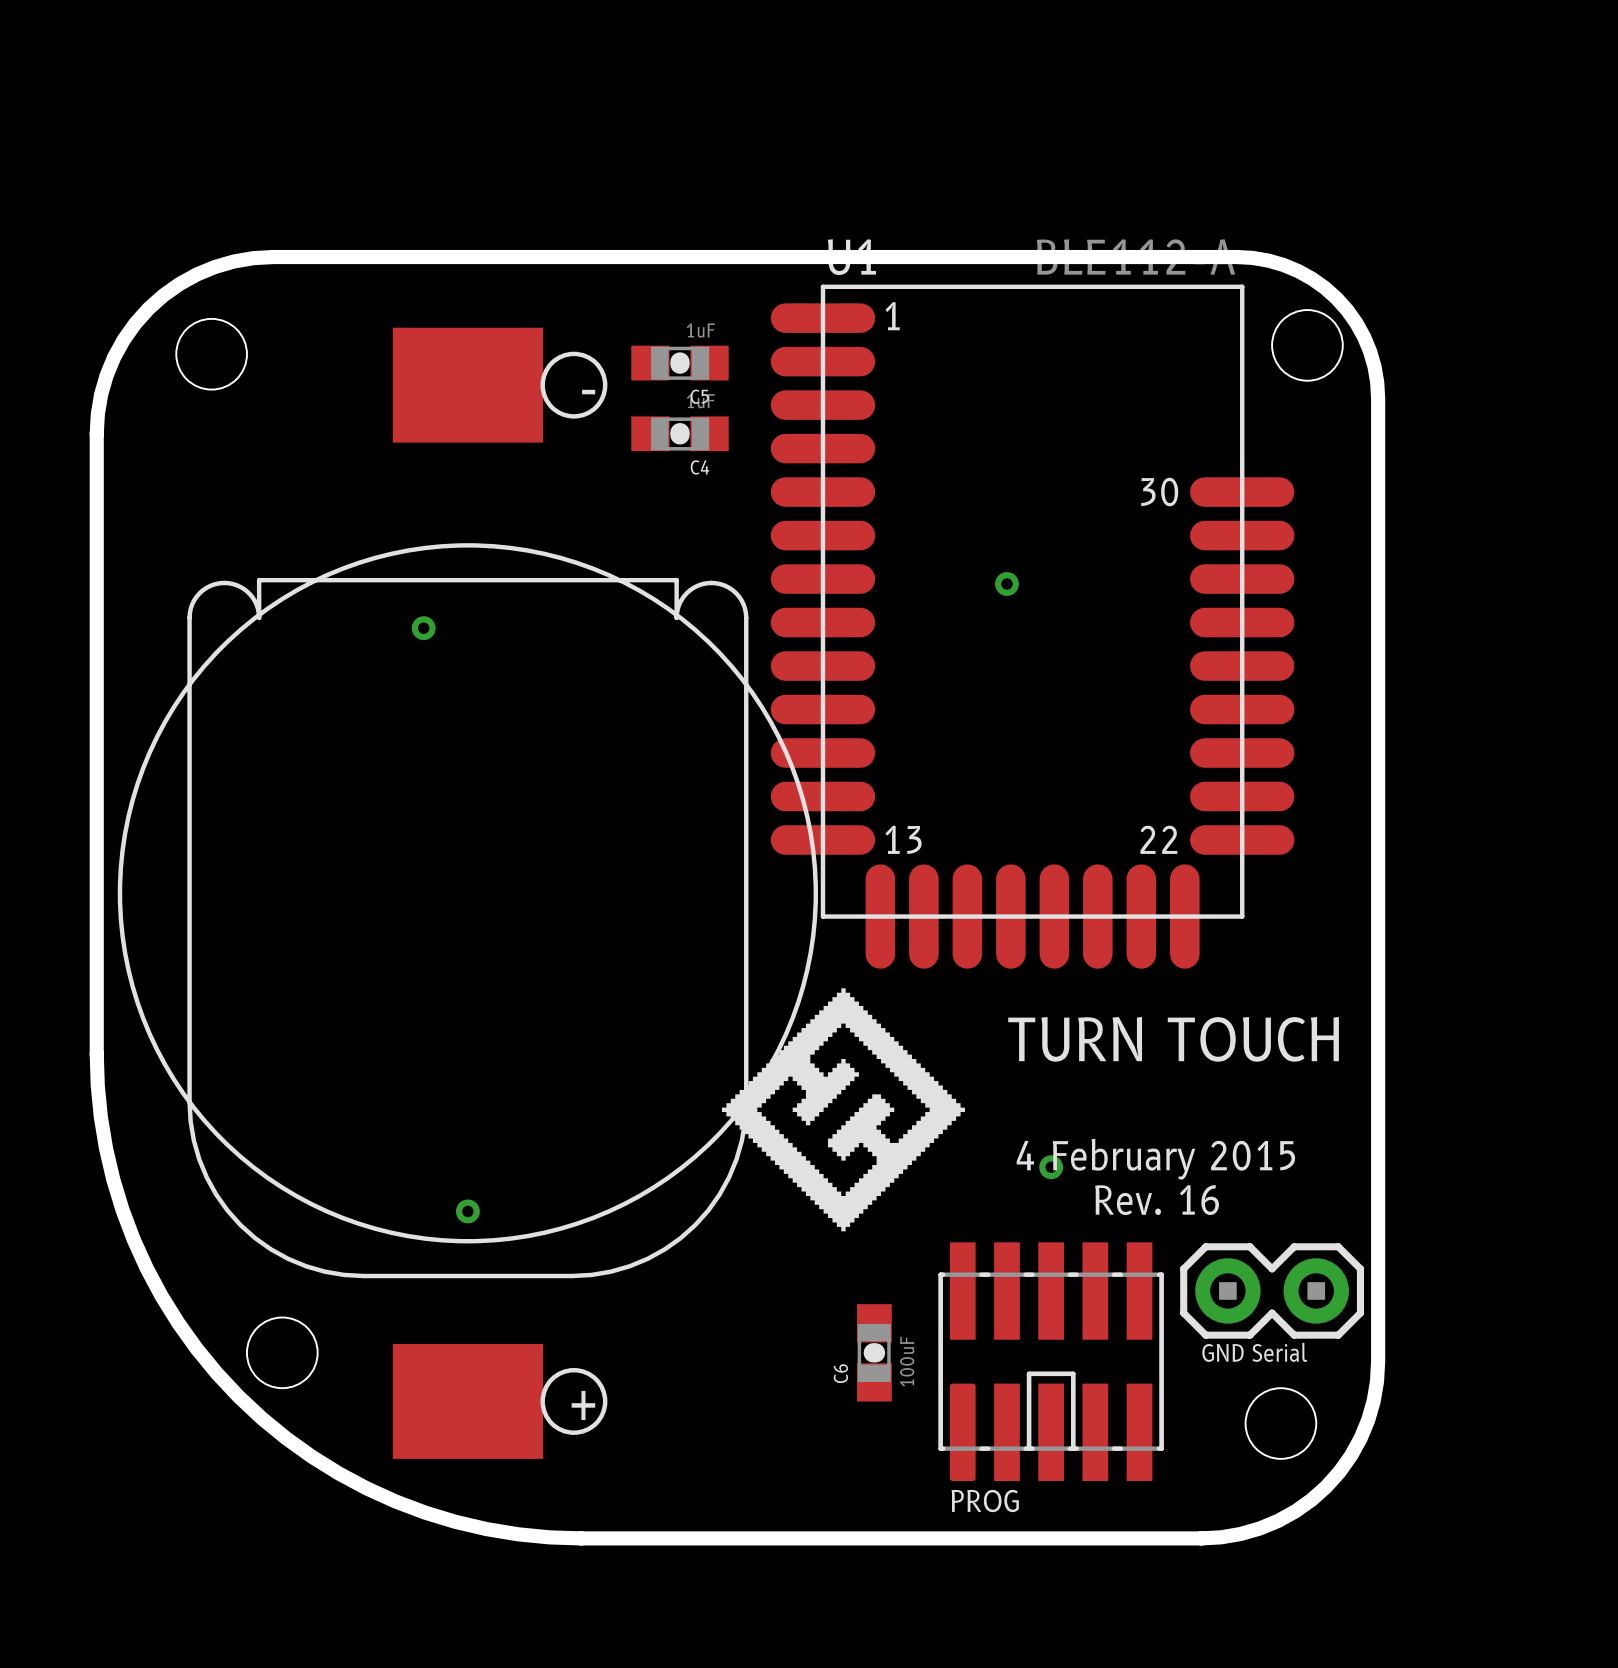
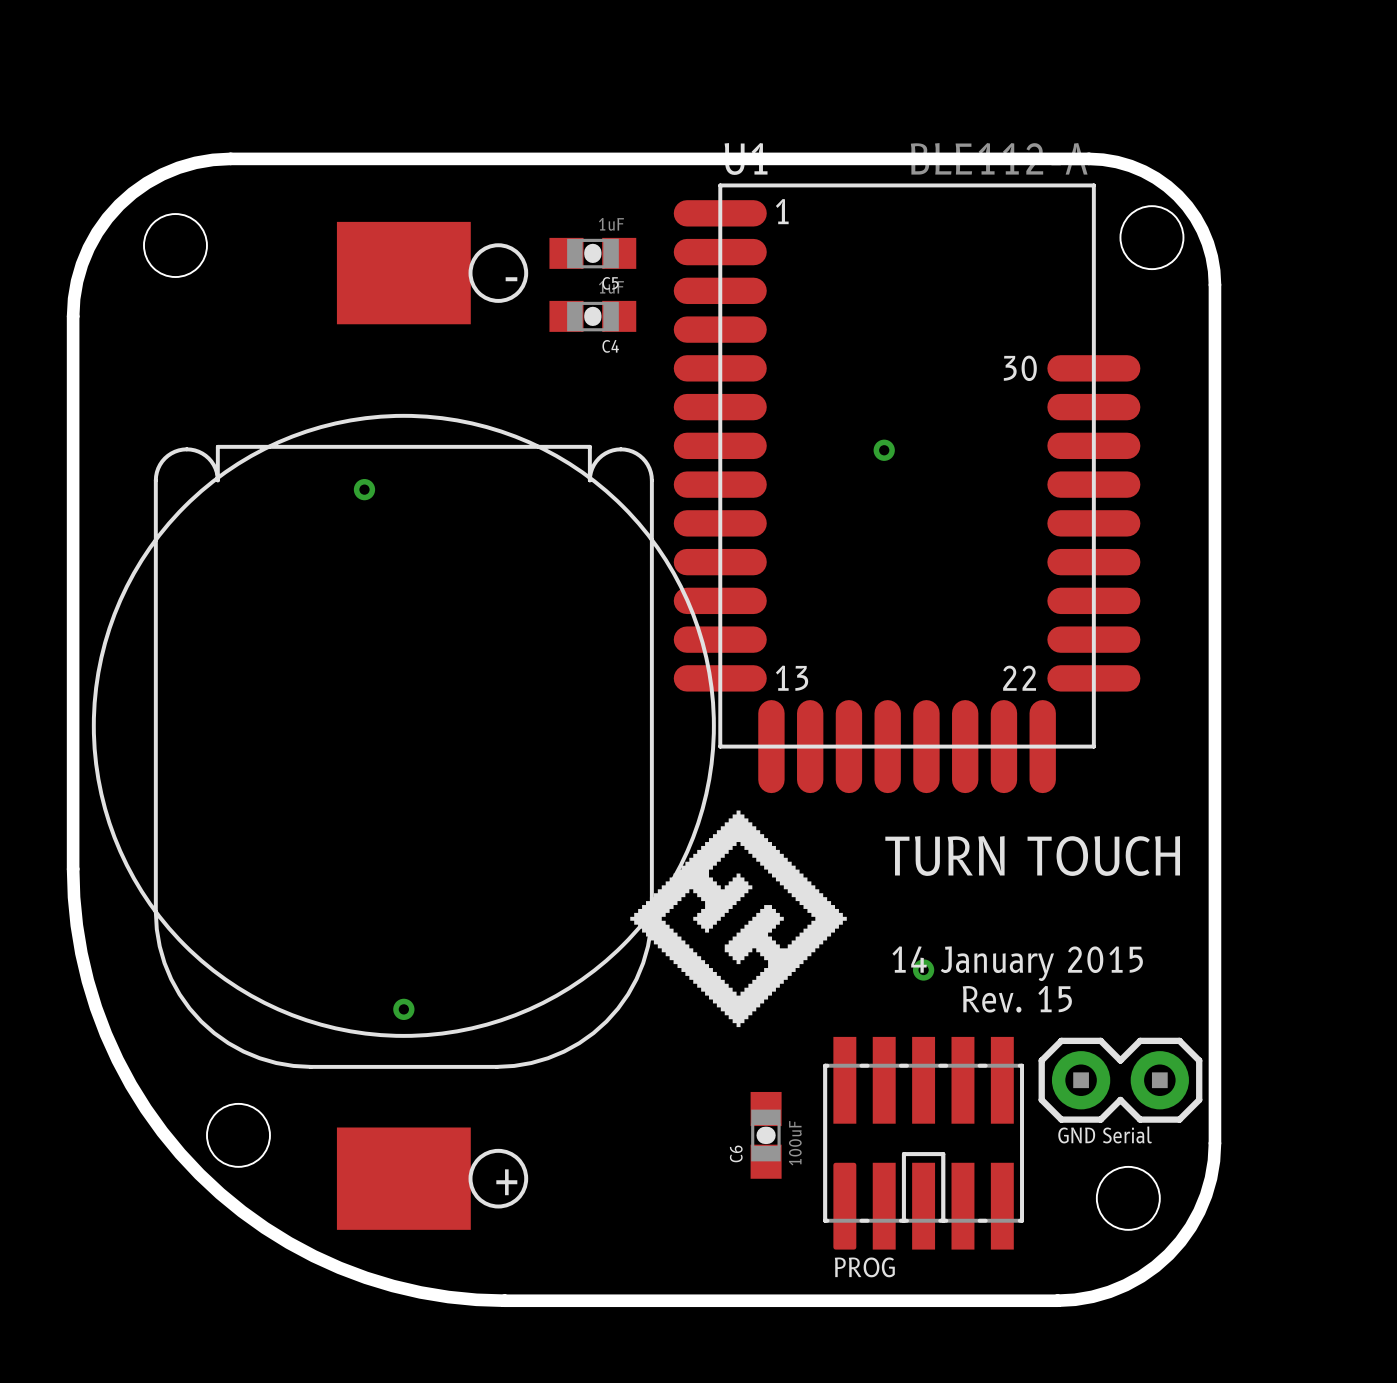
text: 4 February 2015 (1155, 1159) -> 14 January 2015 (1017, 963)
text: Rev. 16 (1157, 1200) -> Rev. 15 (1017, 999)

